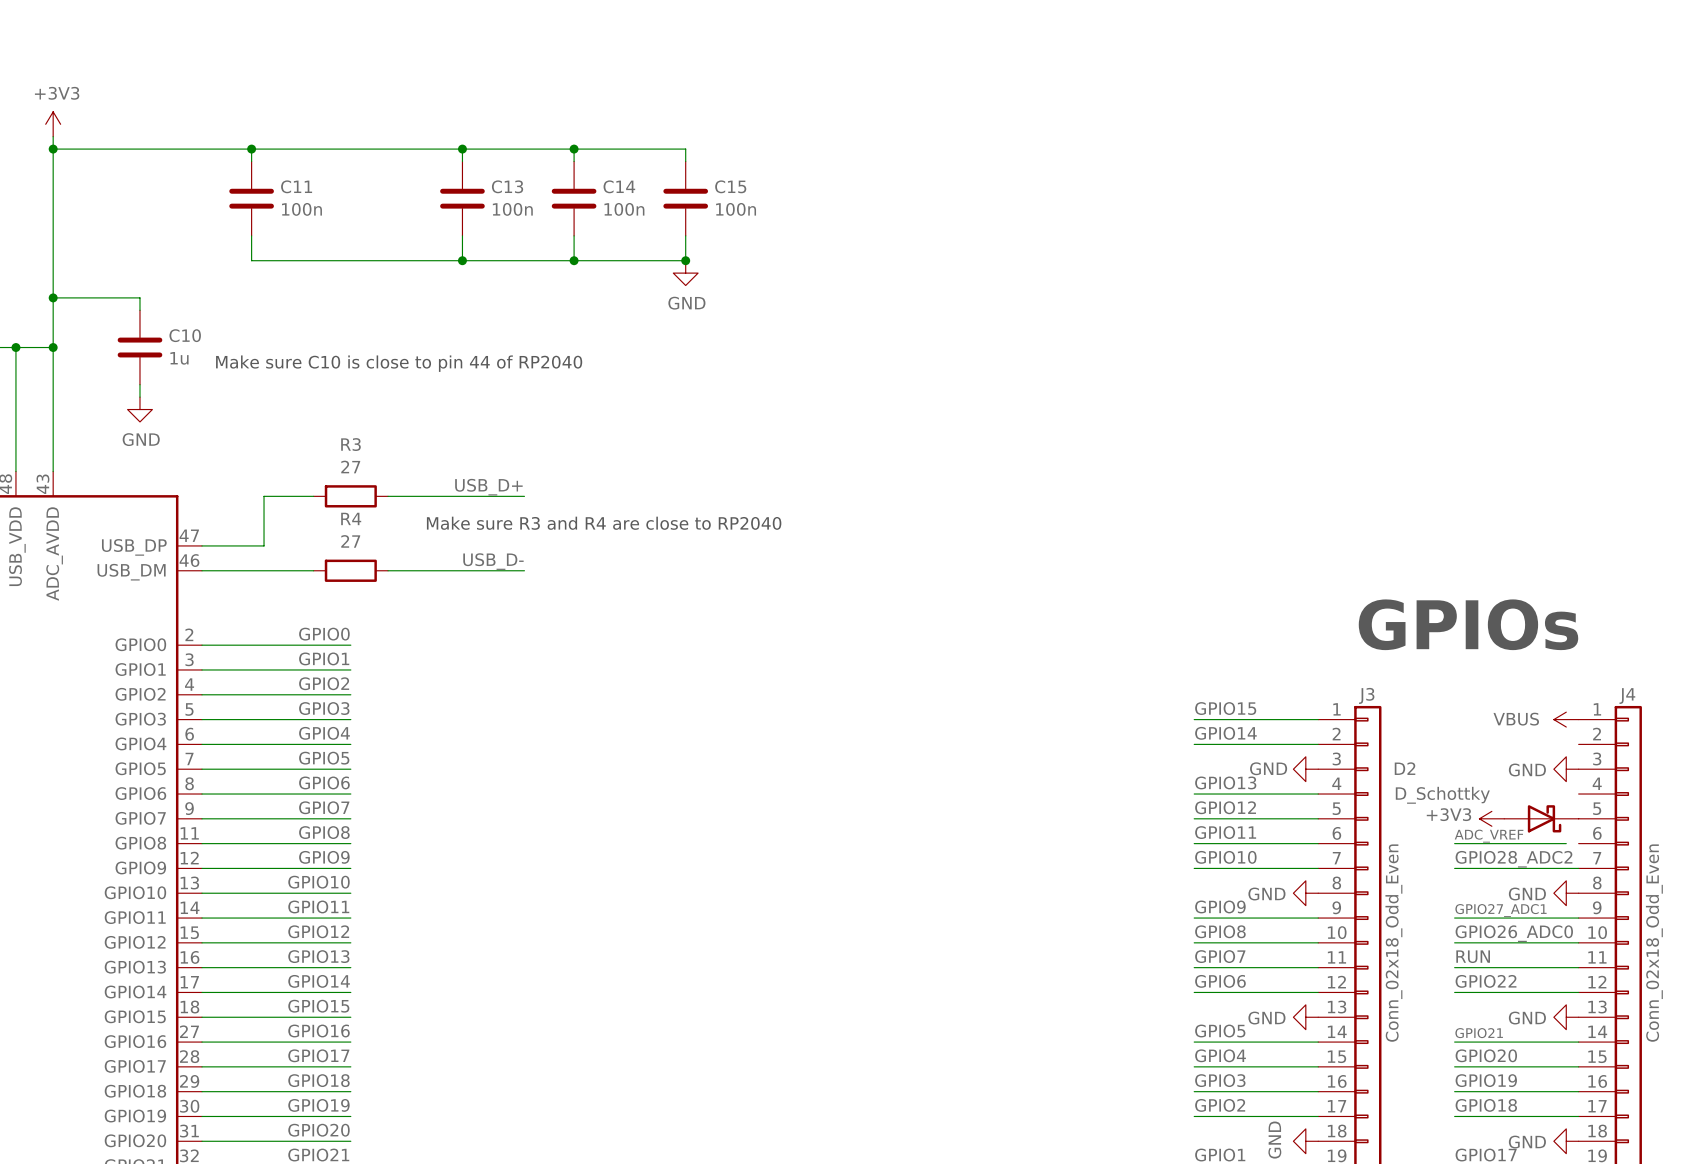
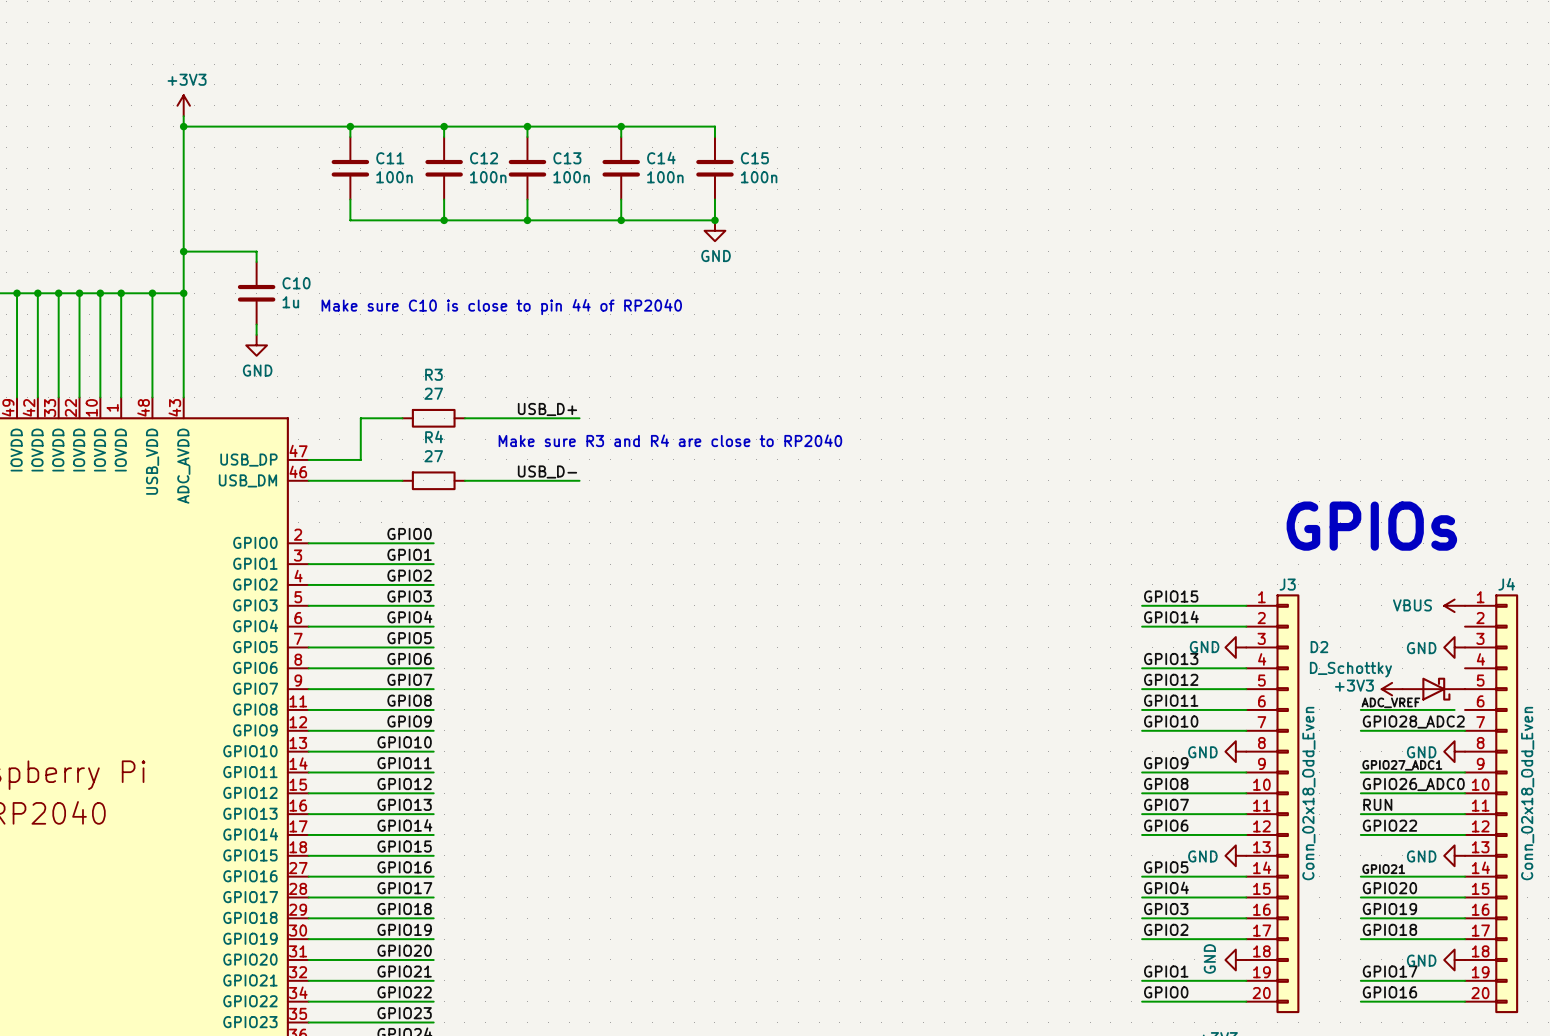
wire: none -> (444, 126) (444, 137)
junction: none -> (444, 126)
C12: none -> 100n (444, 168)
wire: none -> (444, 199) (444, 220)
junction: none -> (444, 220)

